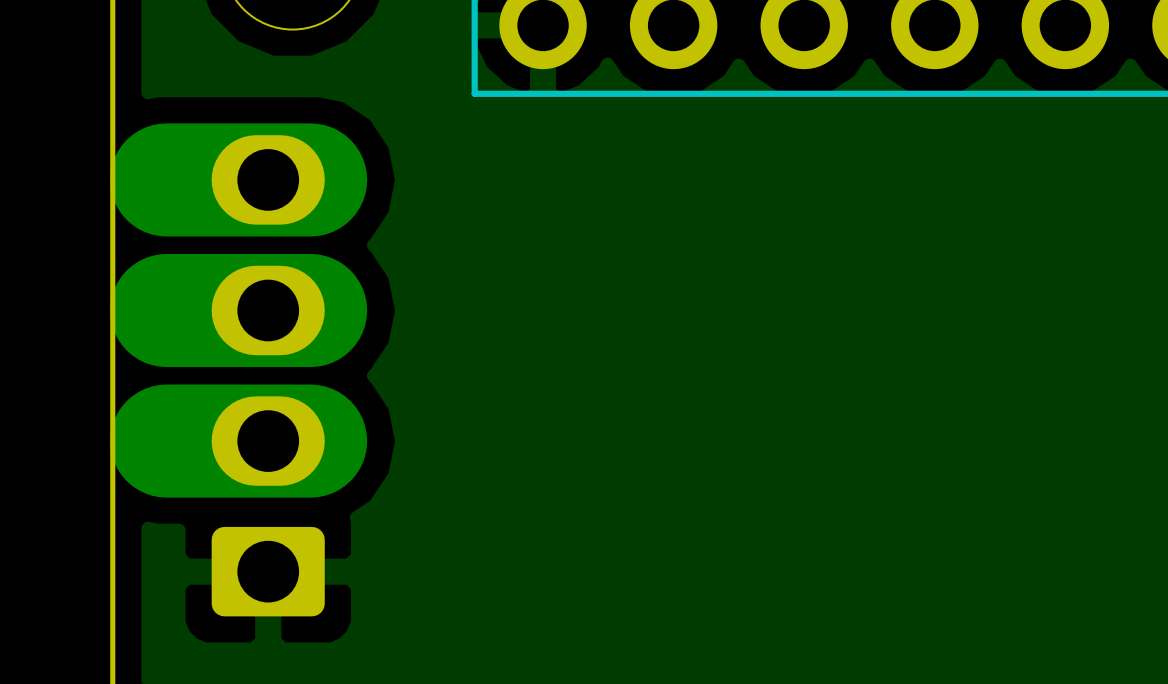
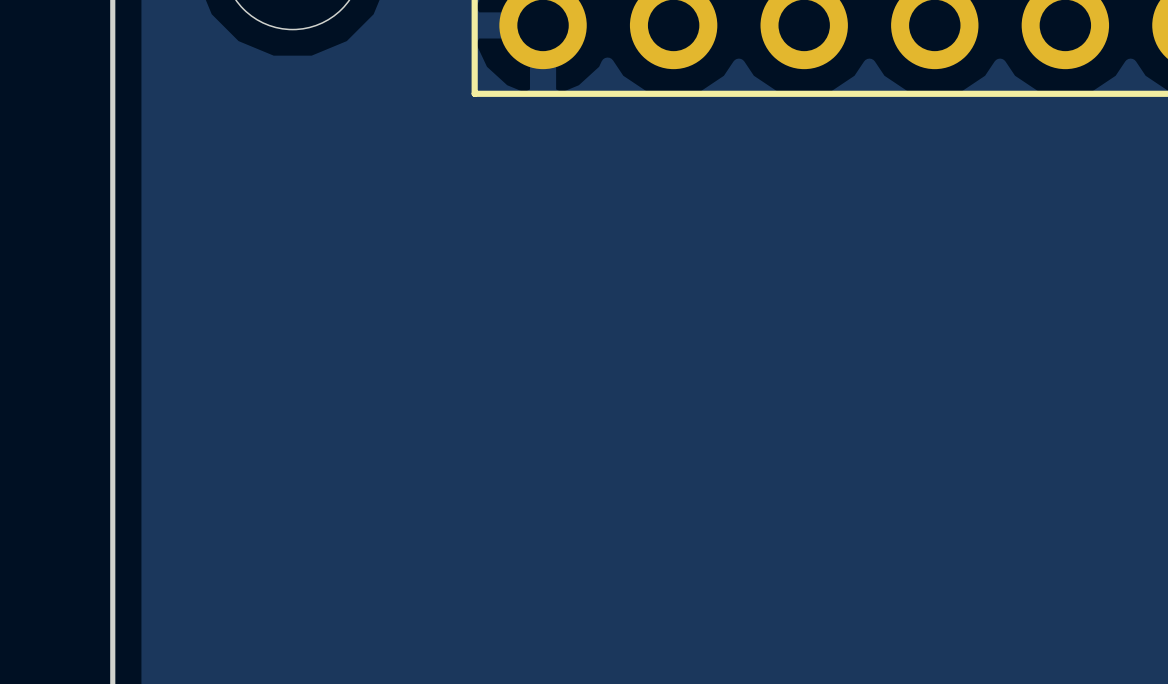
track: (310, 179) (166, 179) -> none
track: (310, 310) (166, 310) -> none
part: (268, 375) -> none
track: (310, 441) (166, 441) -> none

